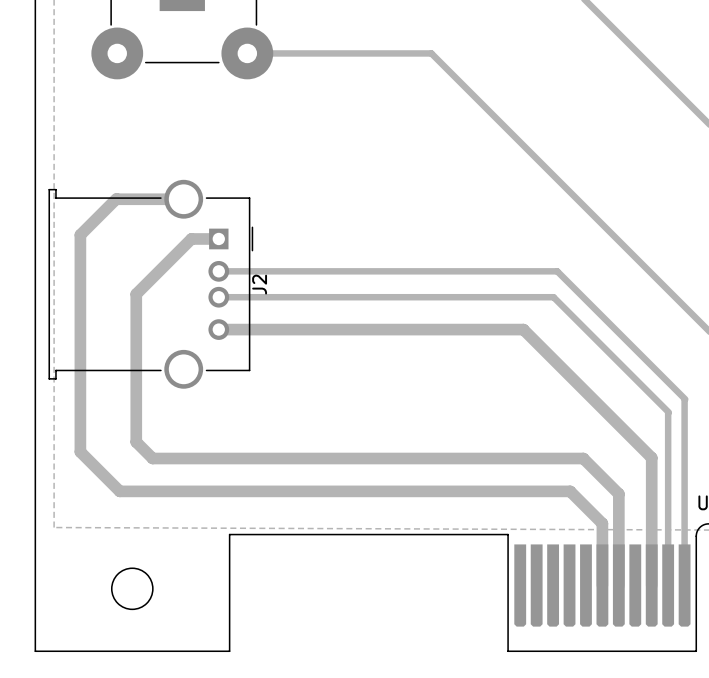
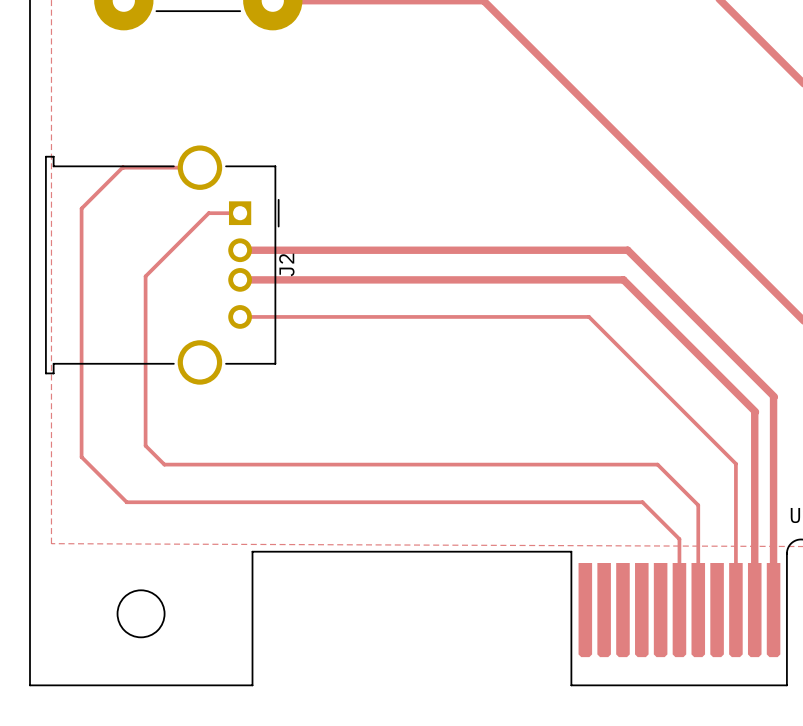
track width: thick (116, 198) (80, 234) (80, 451) (119, 491) (570, 491) (602, 523) (602, 585) -> thin (123, 167) (81, 208) (81, 457) (126, 502) (642, 502) (679, 539) (679, 610)
track width: thick (116, 199) (183, 199) -> thin (123, 167) (199, 167)
track width: thick (218, 238) (191, 238) (136, 294) (136, 442) (152, 458) (583, 458) (618, 493) (618, 585) -> thin (240, 213) (208, 213) (145, 276) (145, 445) (164, 464) (657, 464) (698, 505) (698, 610)
track width: thick (218, 329) (523, 329) (651, 457) (651, 585) -> thin (240, 316) (589, 316) (735, 463) (735, 610)

